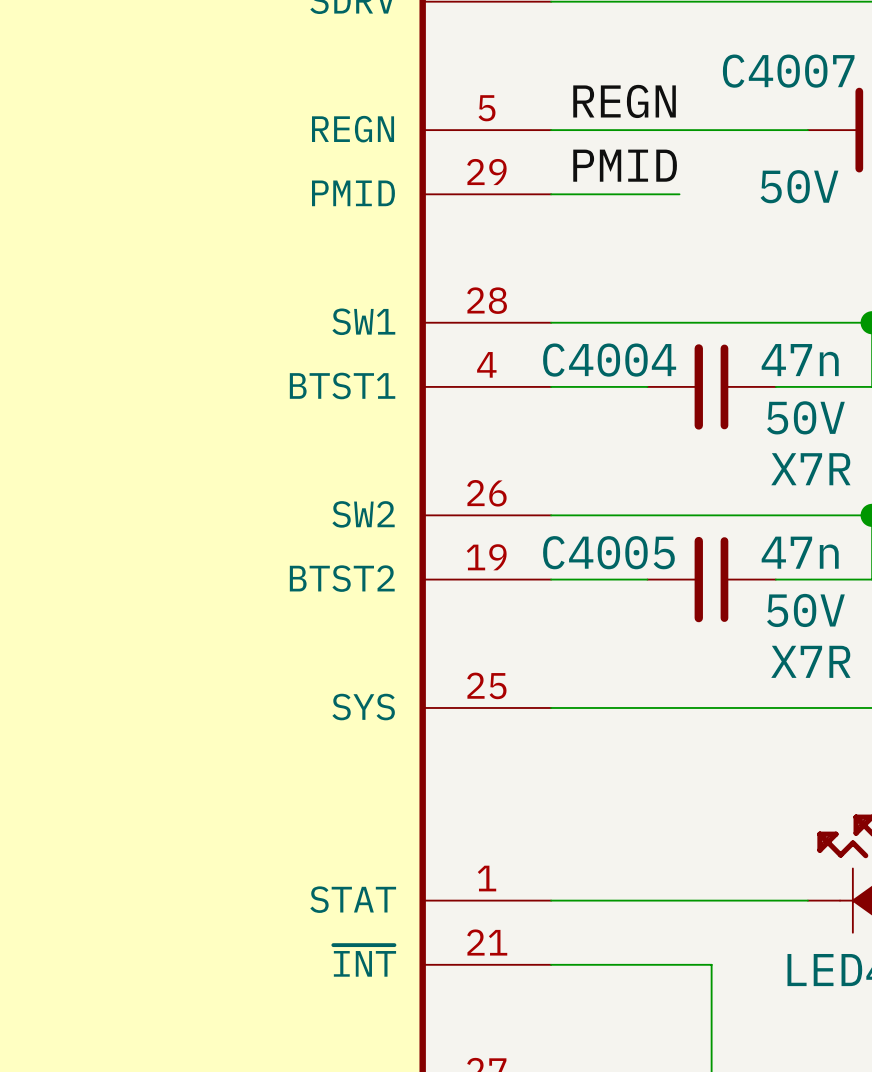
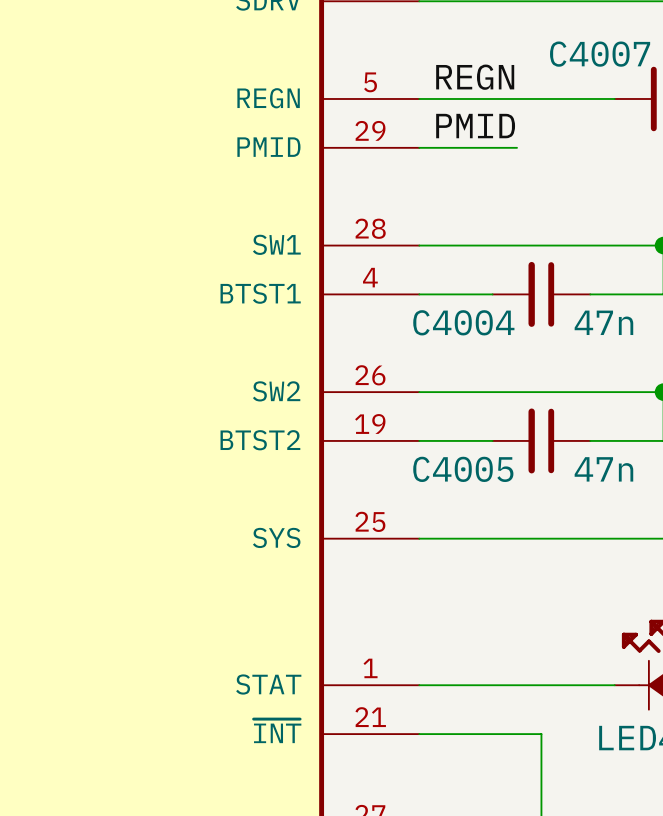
C4007 text: 50V (799, 186) -> none
C4004 name position: C4004 (609, 360) -> C4004 (463, 322)
C4004 value position: 47n (800, 360) -> 47n (603, 322)
C4004 text: 50V (805, 417) -> none
C4004 text: X7R (810, 469) -> none
C4005 name position: C4005 (608, 552) -> C4005 (463, 469)
C4005 value position: 47n (800, 552) -> 47n (603, 469)
C4005 text: 50V (805, 610) -> none
C4005 text: X7R (810, 661) -> none

